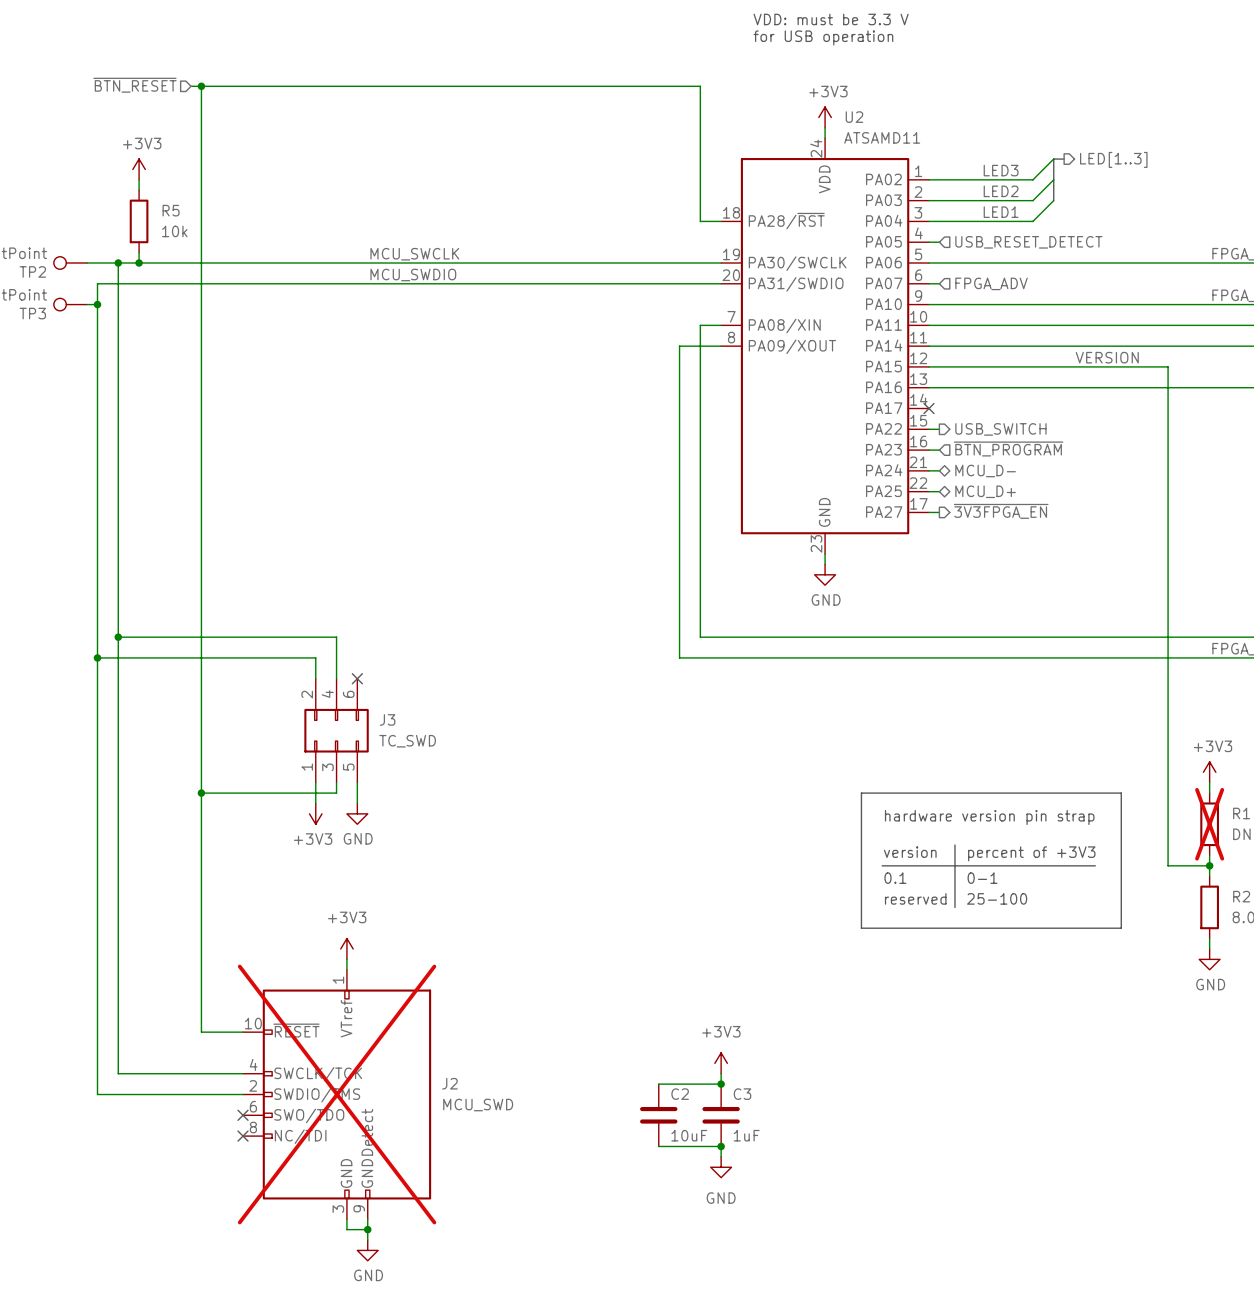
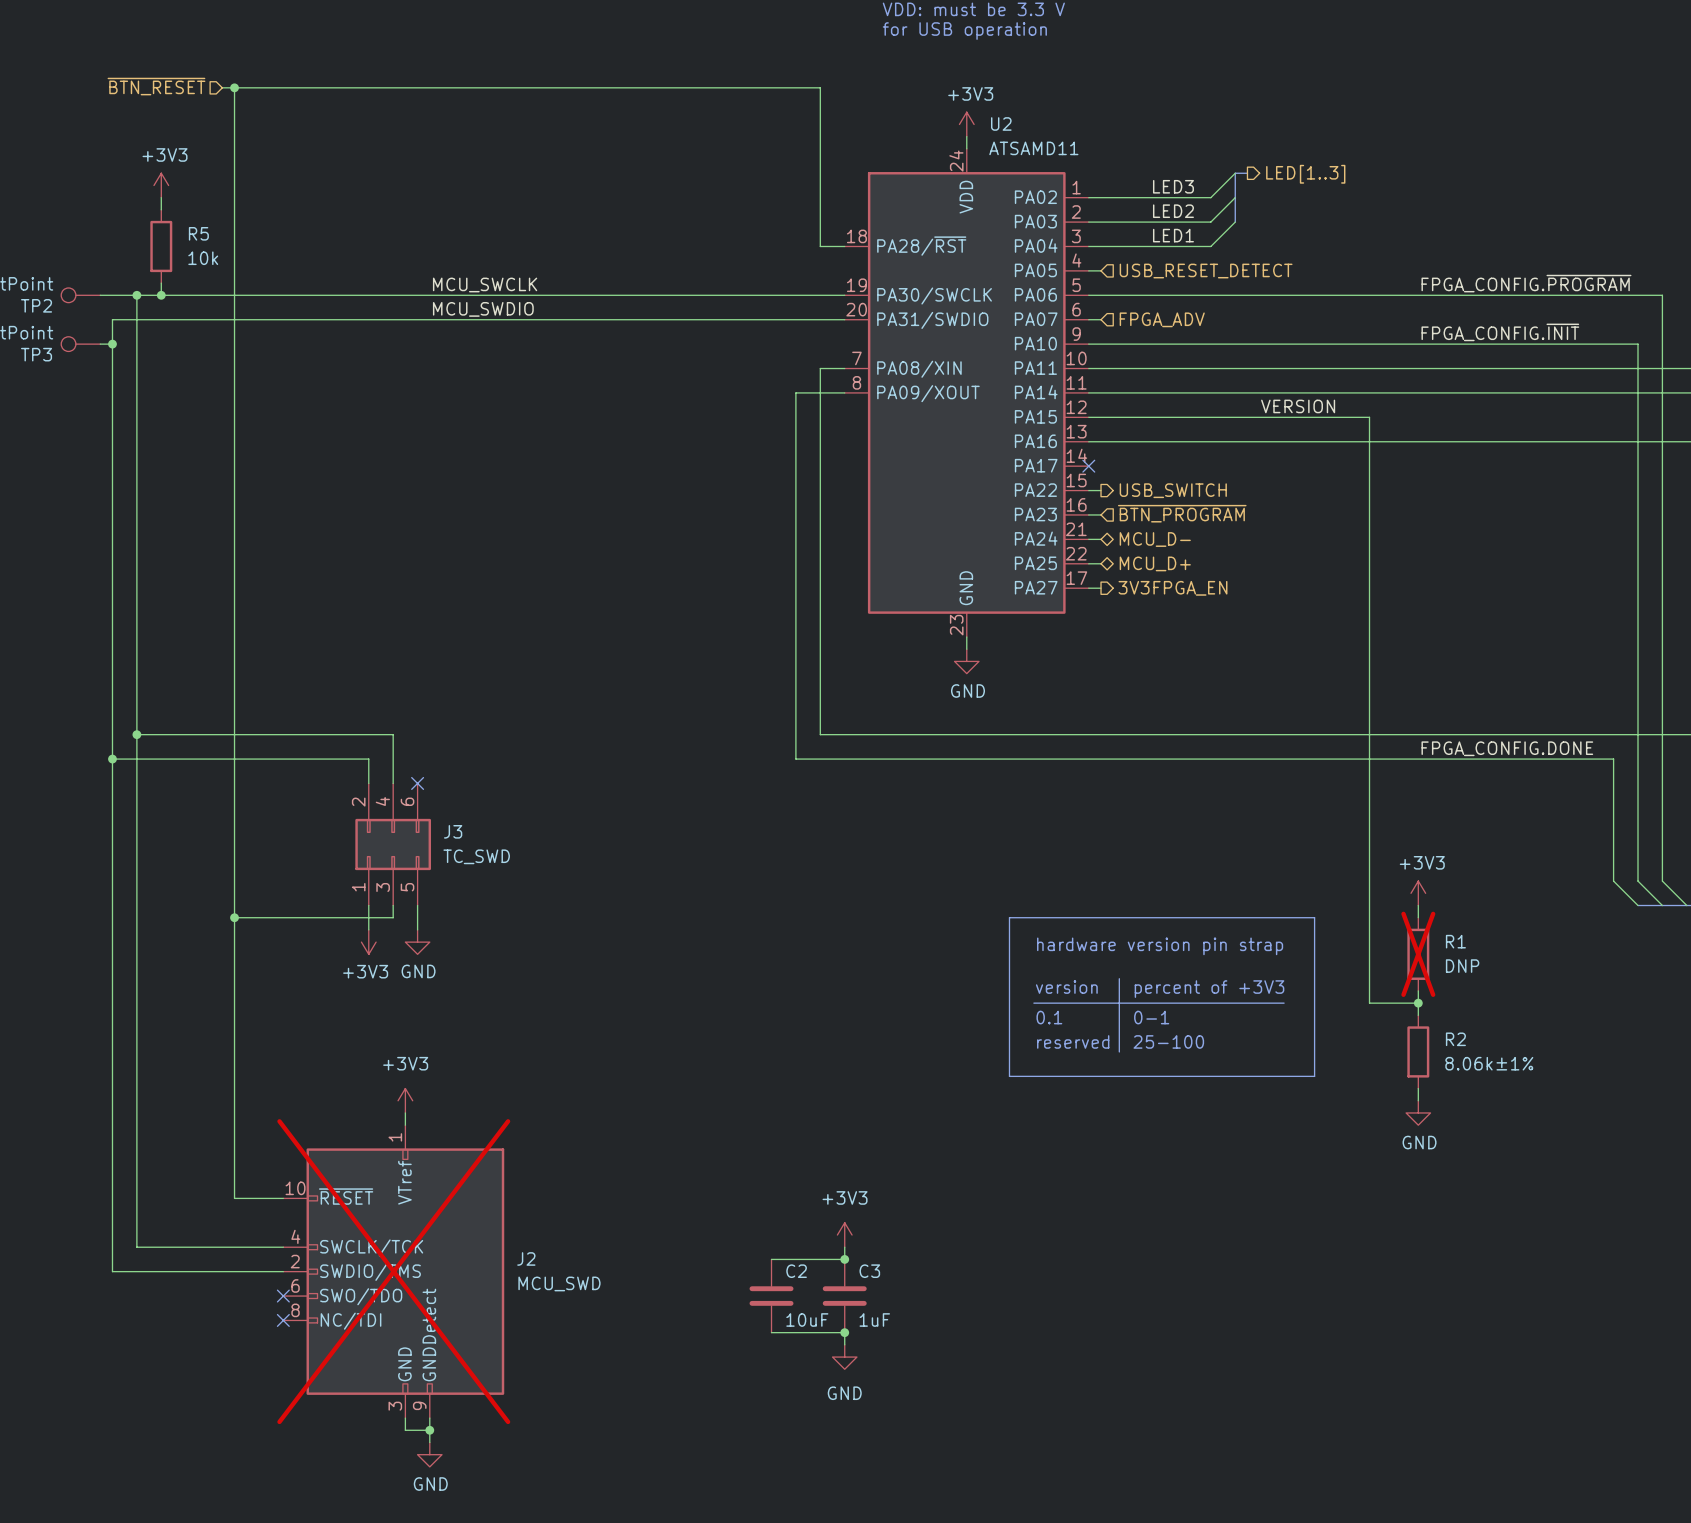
hierarchical label: ~{3V3FPGA_EN} (1001, 511) -> 3V3FPGA_EN (1172, 588)

